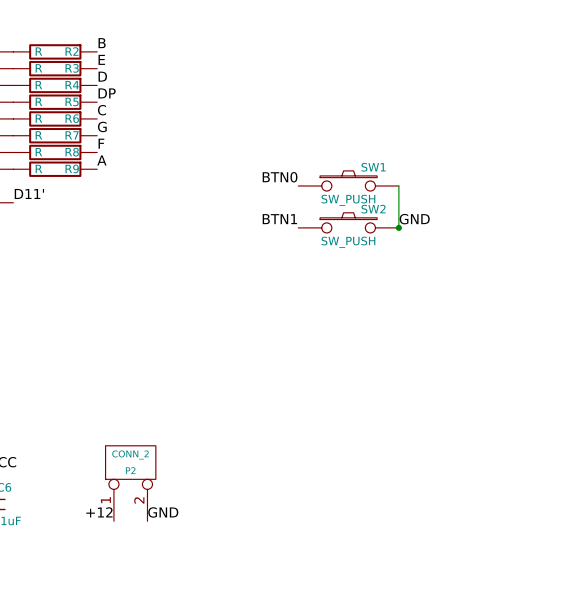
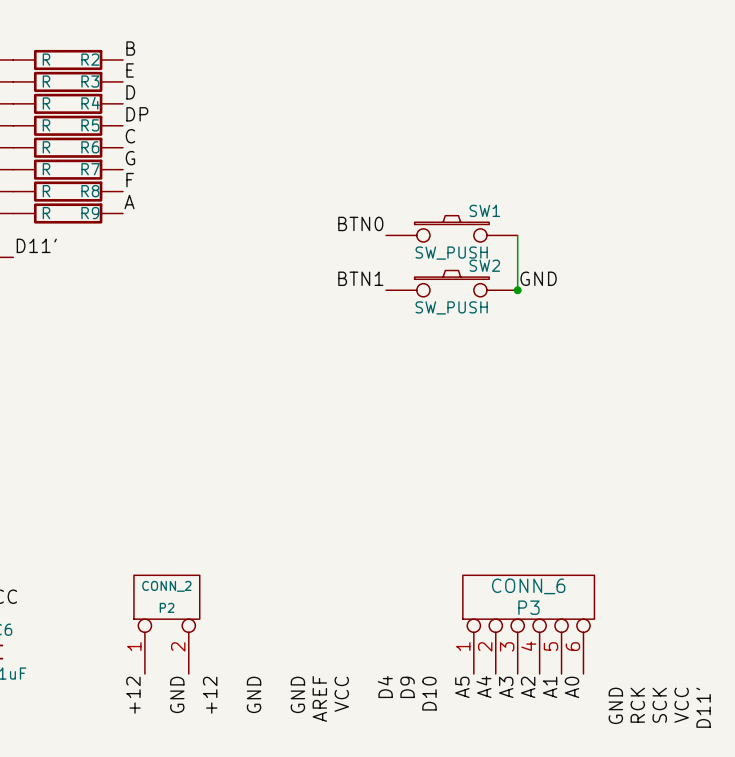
P3: none -> CONN_6 (528, 624)
label rotation: 0° (99, 512) -> 90° counterclockwise (133, 695)
label rotation: 0° (163, 512) -> 90° counterclockwise (177, 694)
label position: GND (163, 512) -> GND (177, 694)
label: none -> D4 (385, 687)
label: none -> D9 (407, 687)
label: none -> A5 (462, 687)
label: none -> A4 (483, 687)
label: none -> A3 (506, 687)
label: none -> A2 (528, 687)
label: none -> A1 (550, 687)
label: none -> A0 (571, 687)
label: none -> +12 (210, 695)
label: none -> VCC (341, 694)
label: none -> D10 (429, 693)
label: none -> GND (254, 694)
label: none -> GND (297, 694)
label: none -> AREF (319, 698)
label: none -> RCK (637, 705)
label: none -> SCK (659, 705)
label: none -> VCC (681, 705)
label: none -> GND (615, 705)
label: none -> D11' (703, 707)

